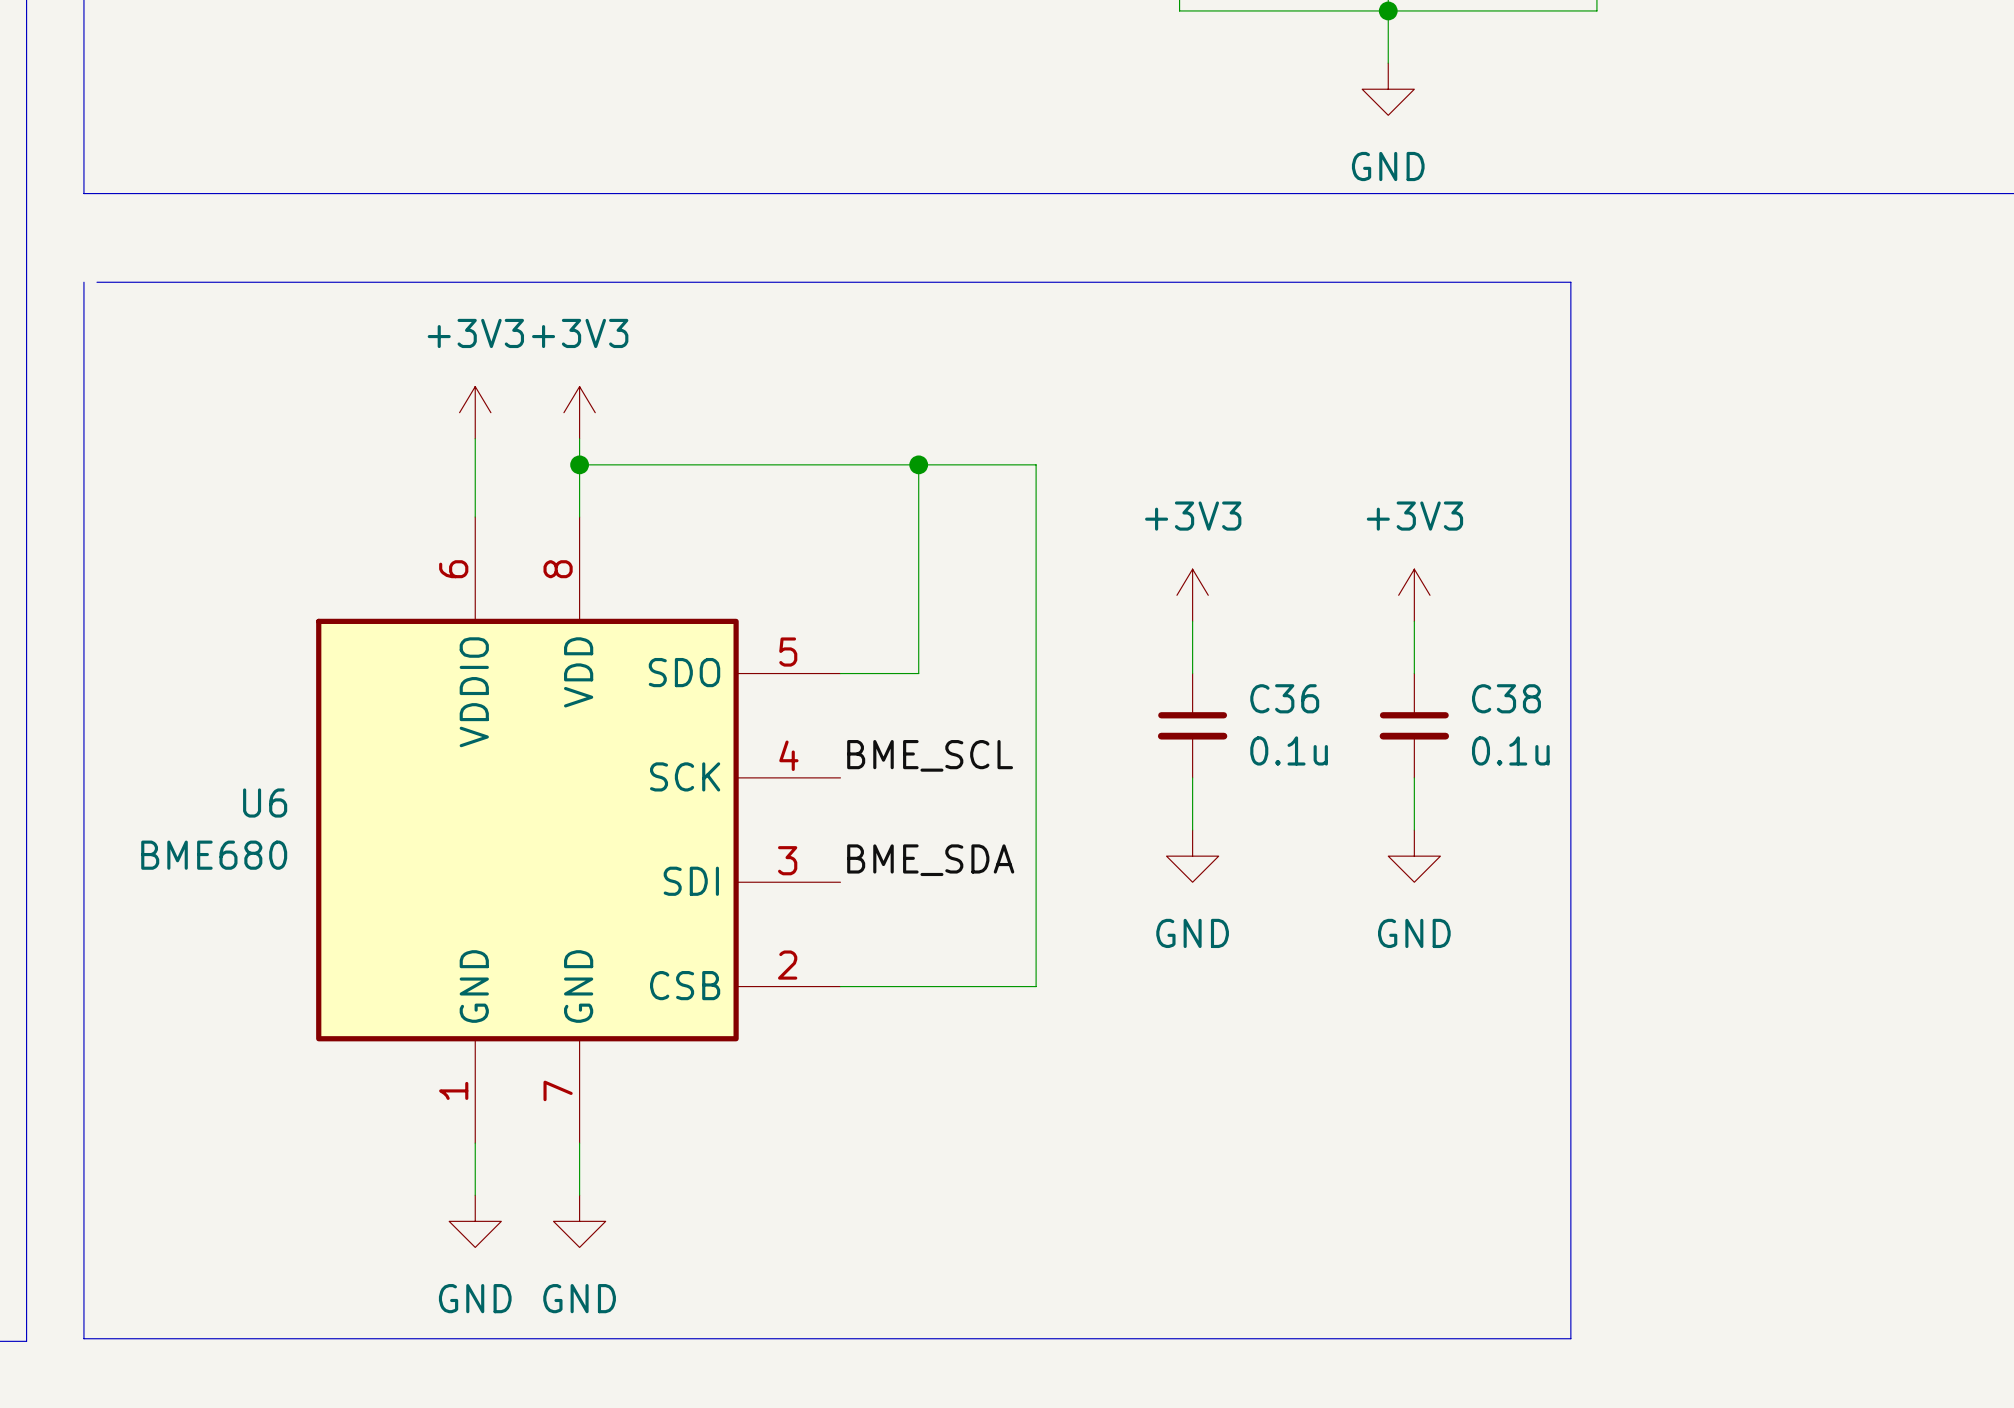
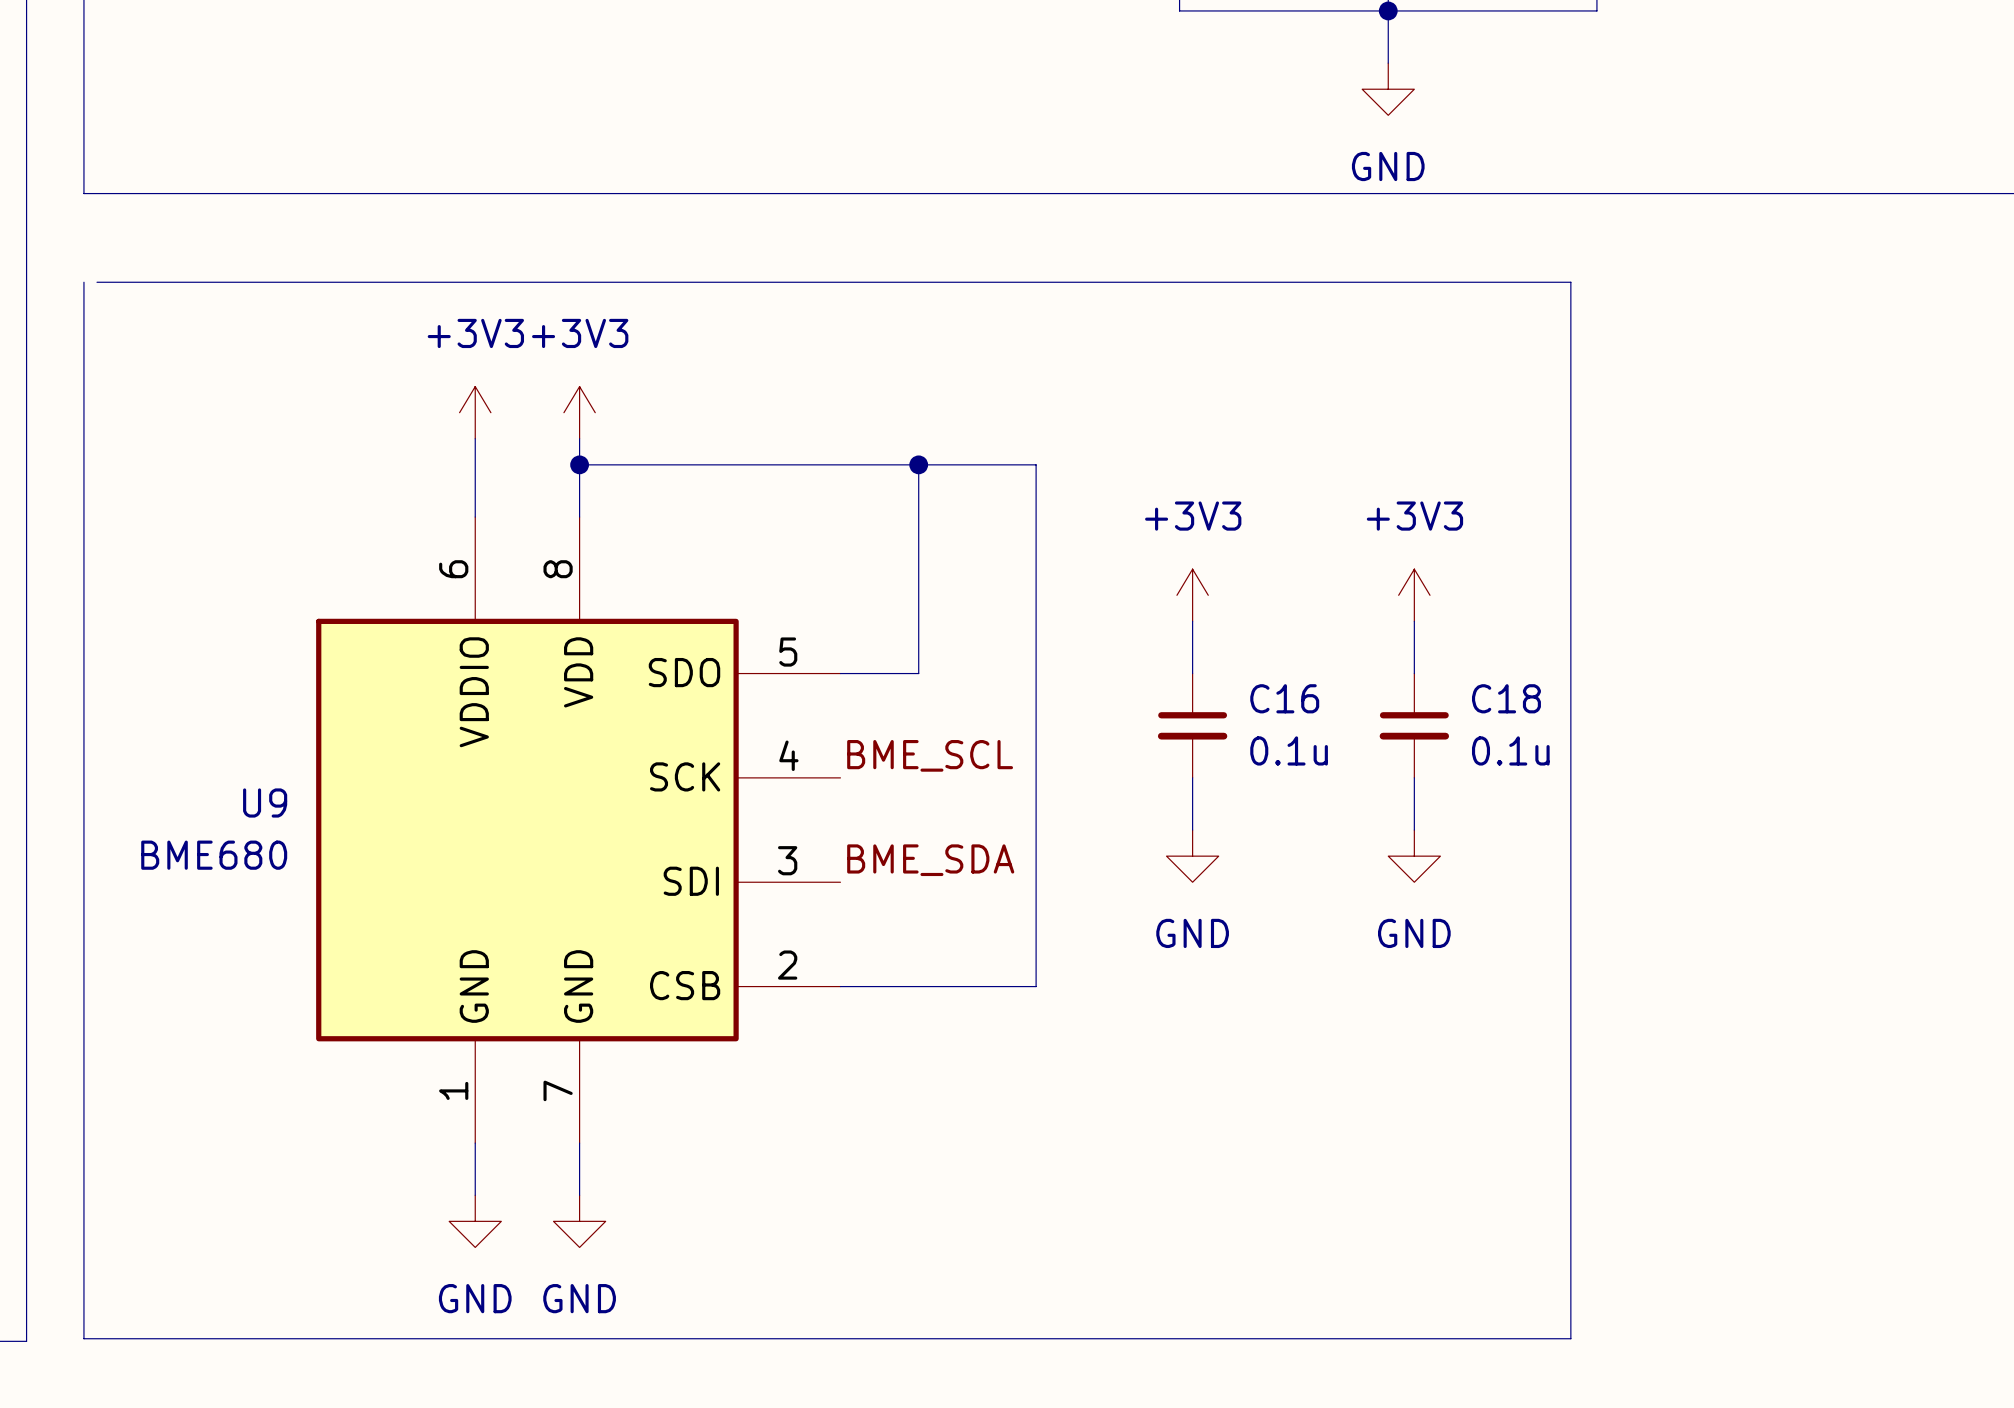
C36 name: C36 (1284, 698) -> C16 (1284, 698)
C38 name: C38 (1506, 698) -> C18 (1506, 698)
U6 name: U6 (265, 803) -> U9 (265, 803)

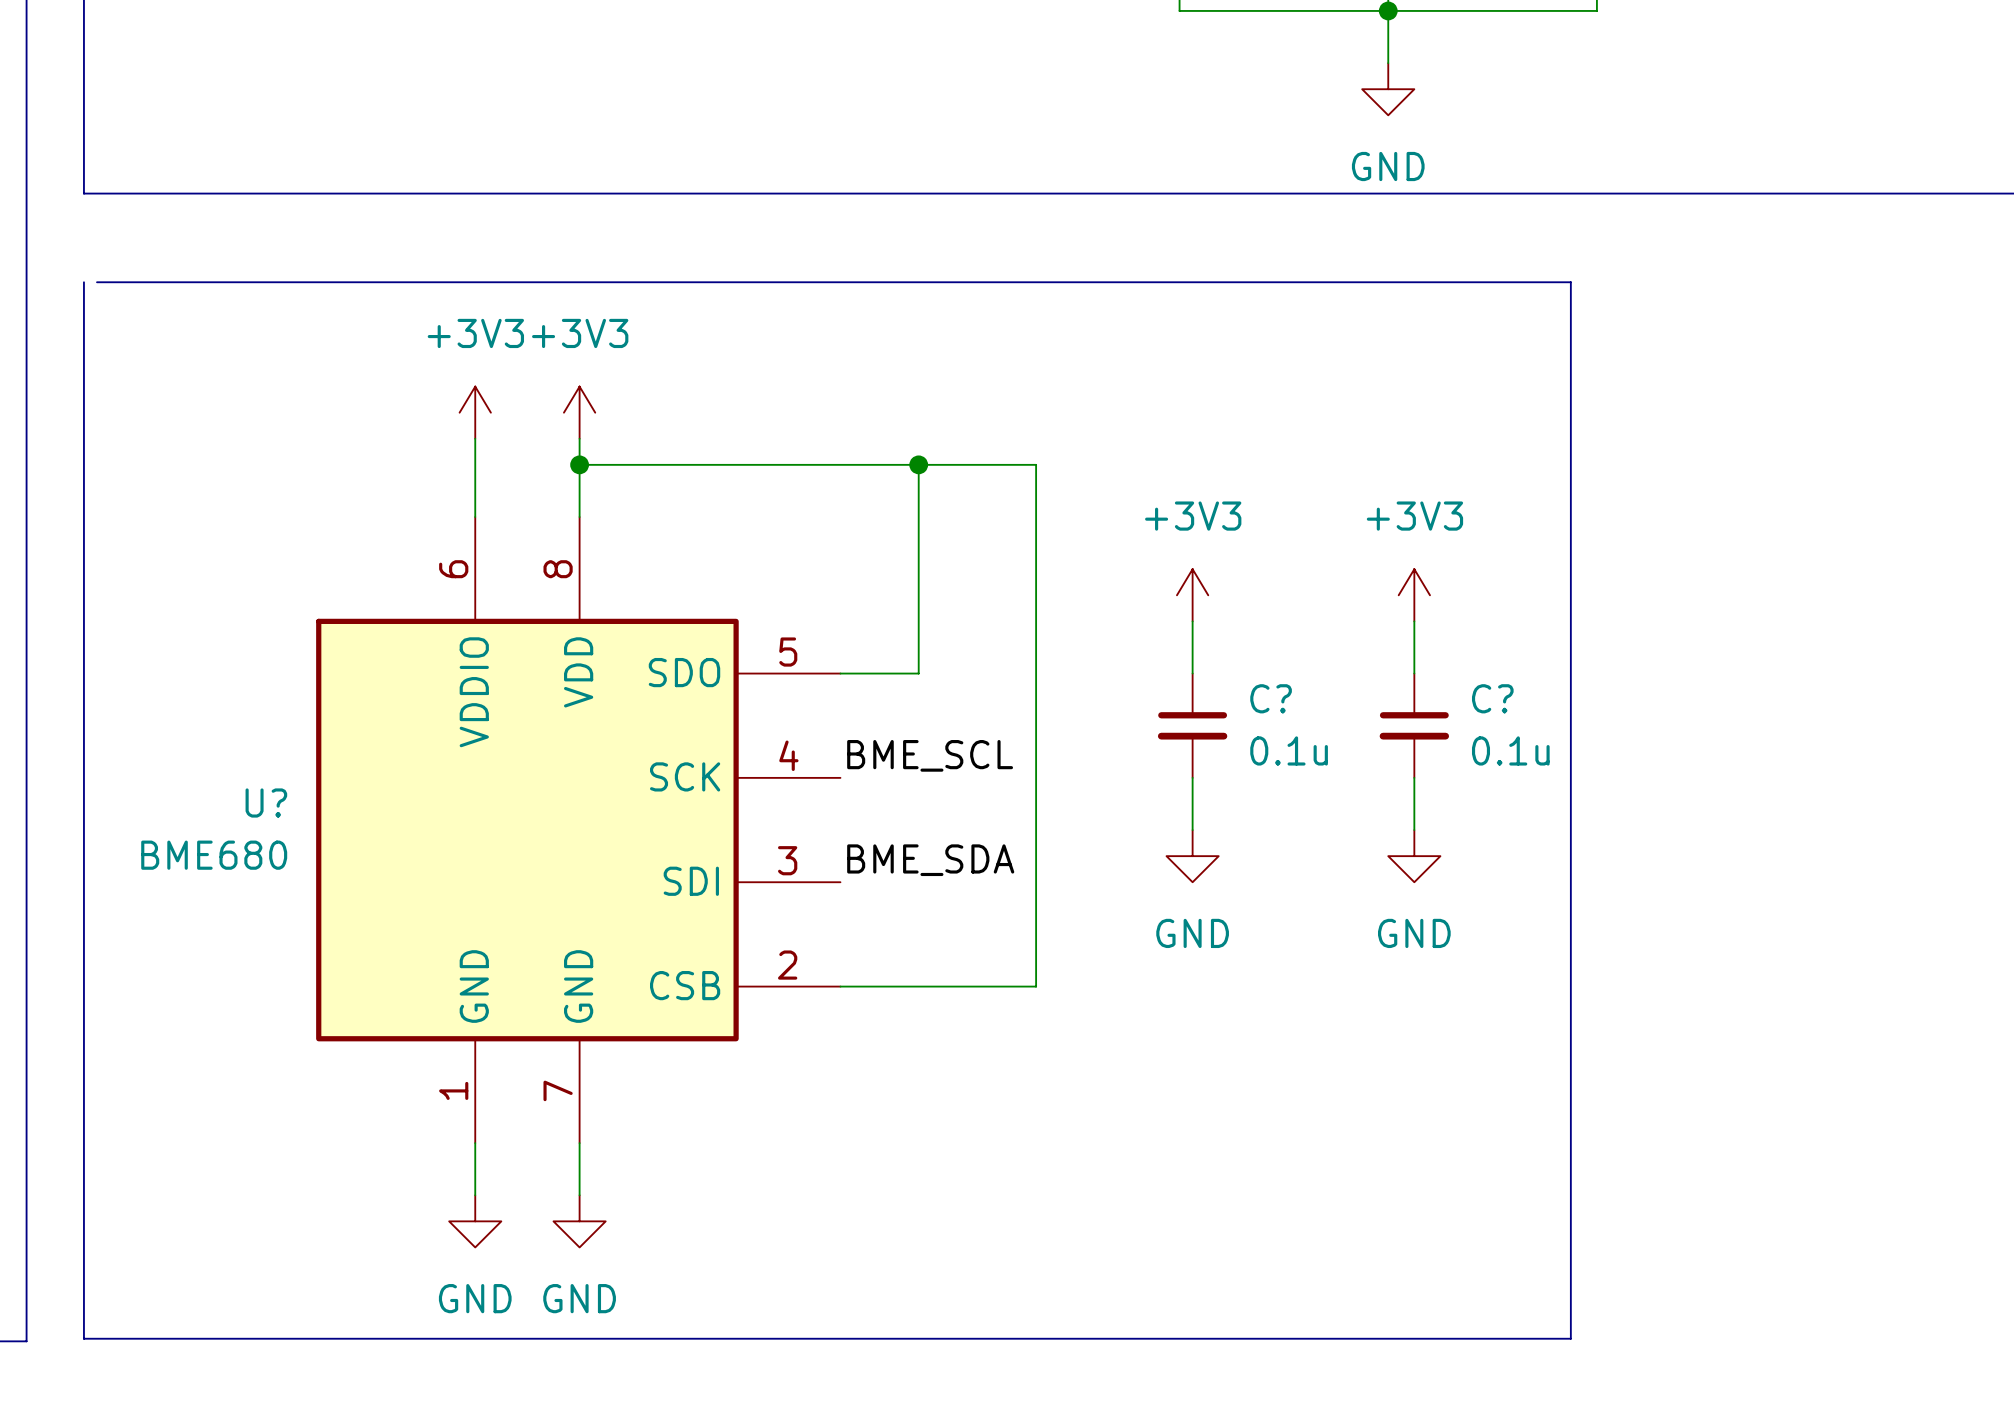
C16 name: C16 (1284, 698) -> C? (1271, 698)
C18 name: C18 (1506, 698) -> C? (1492, 698)
U9 name: U9 (265, 803) -> U? (266, 803)

